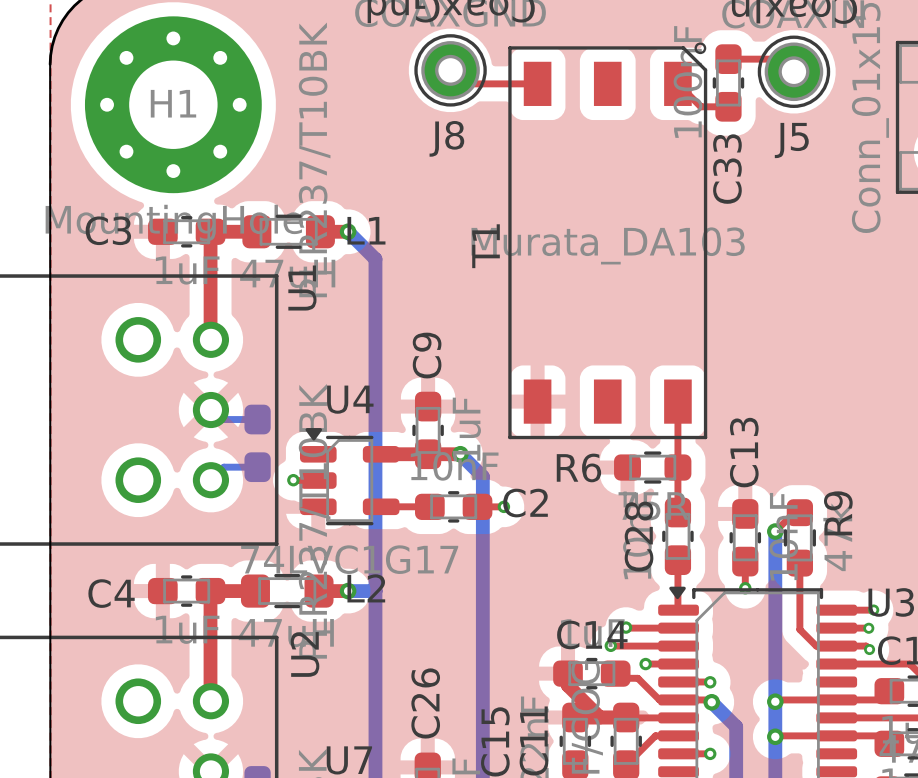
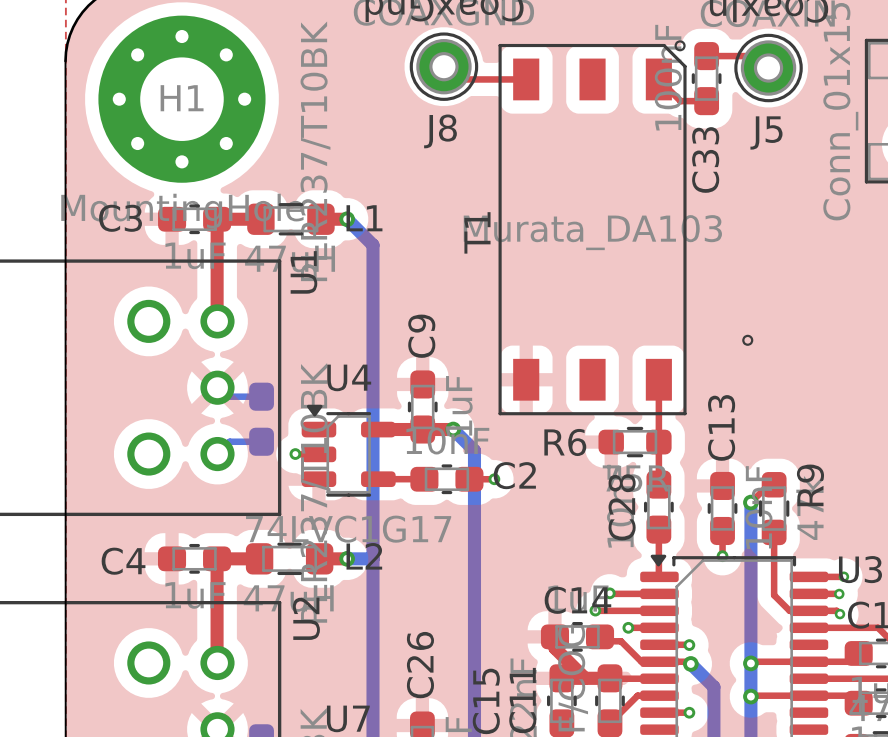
text: none -> ° (747, 340)

